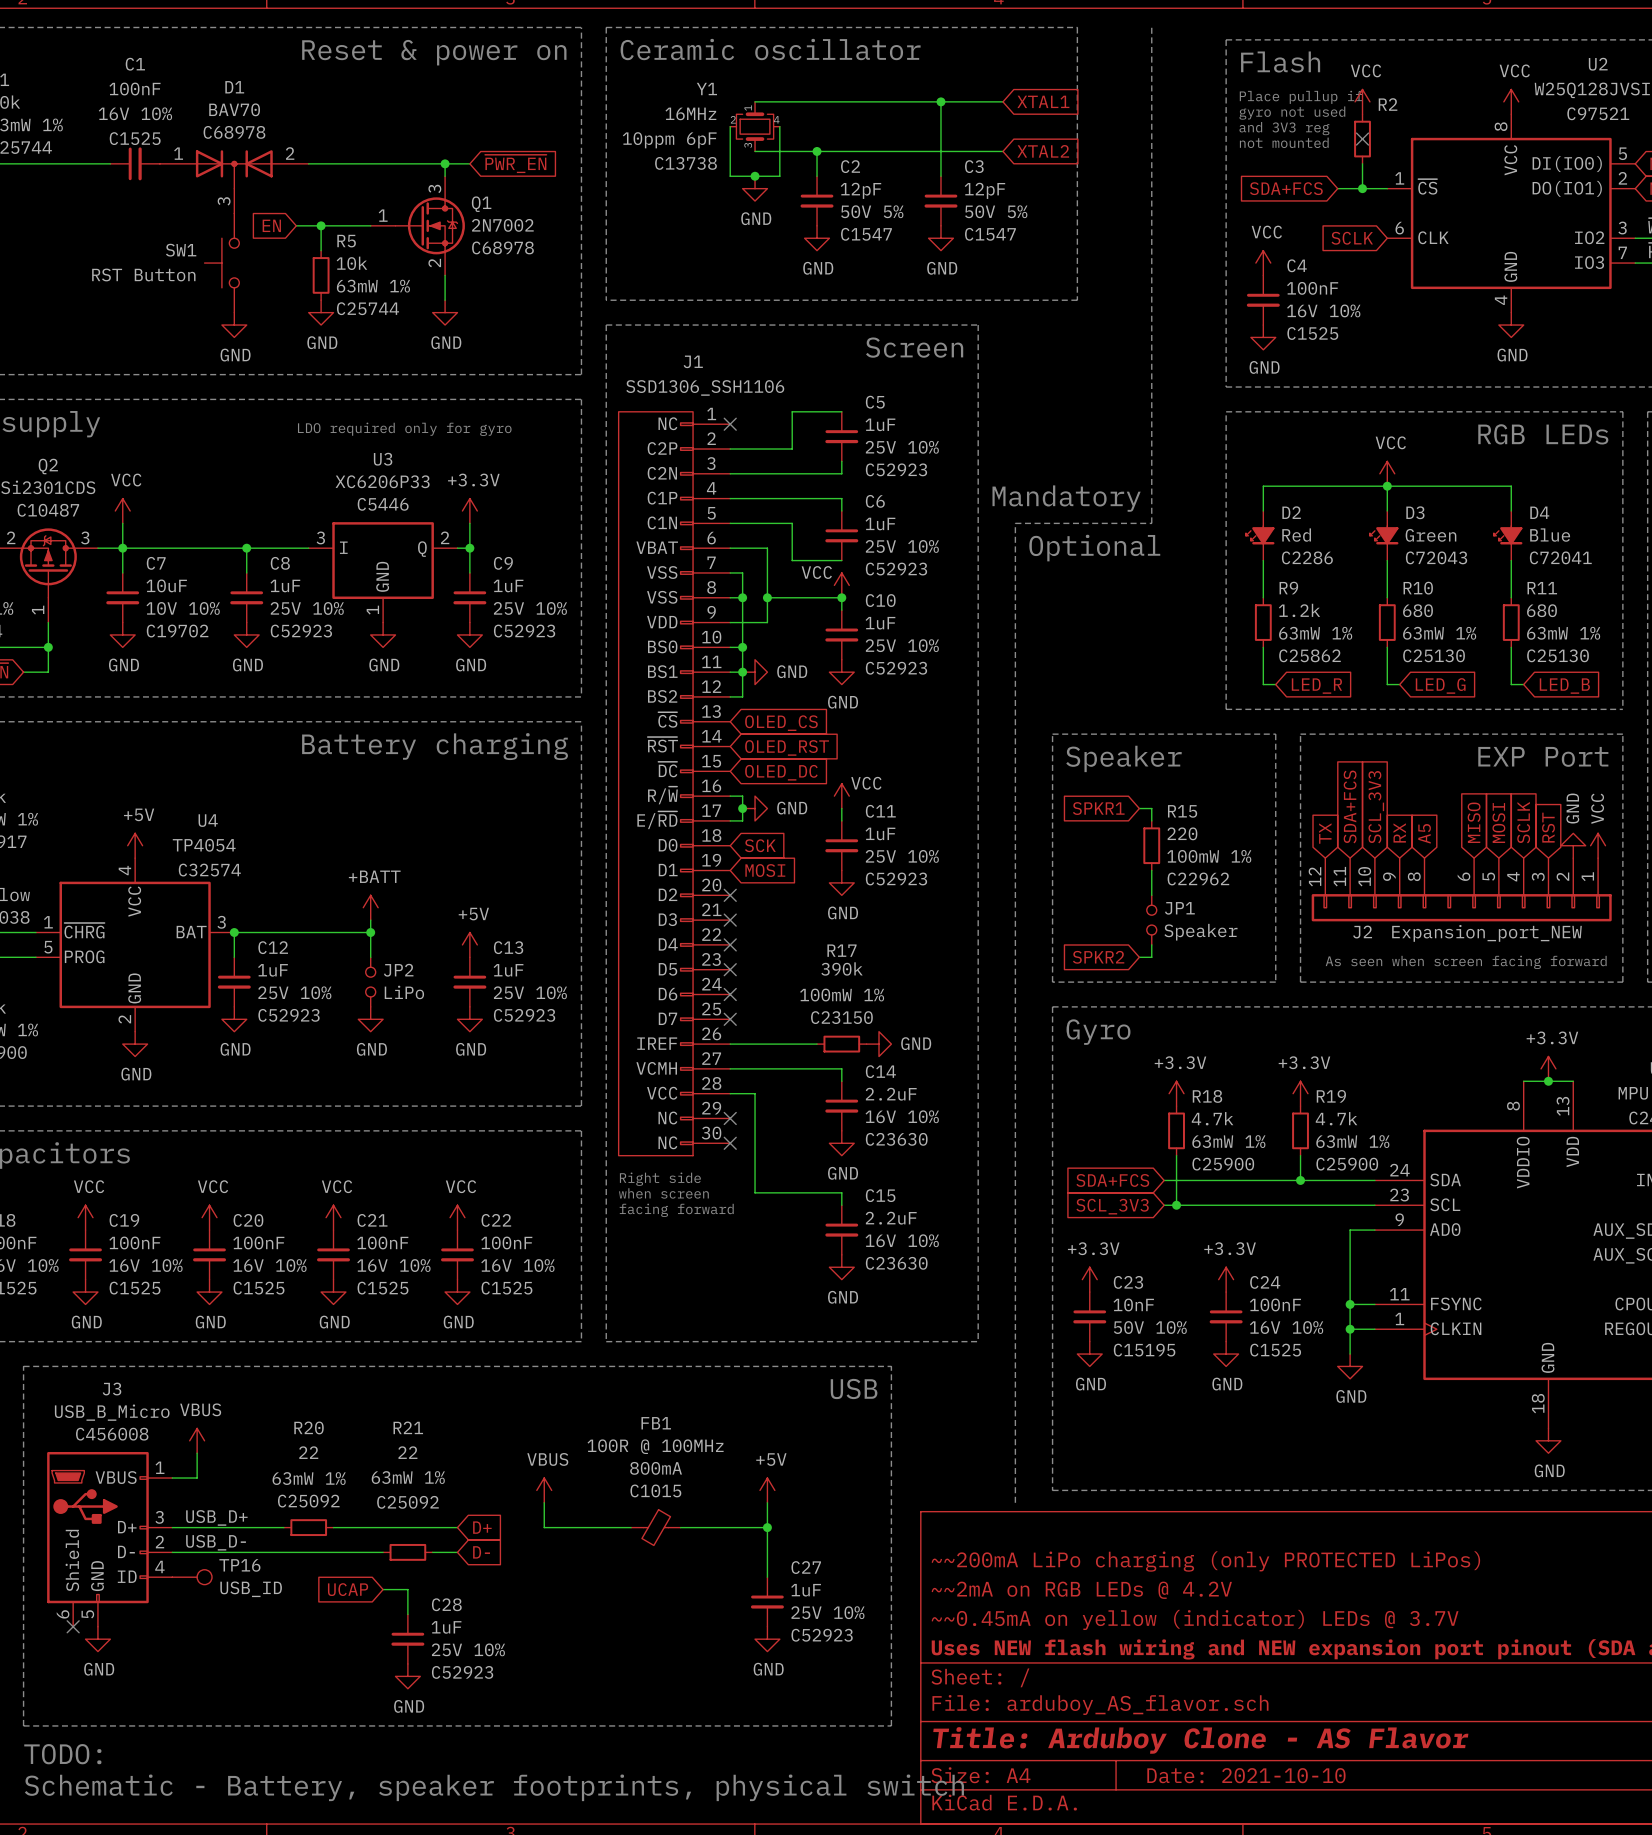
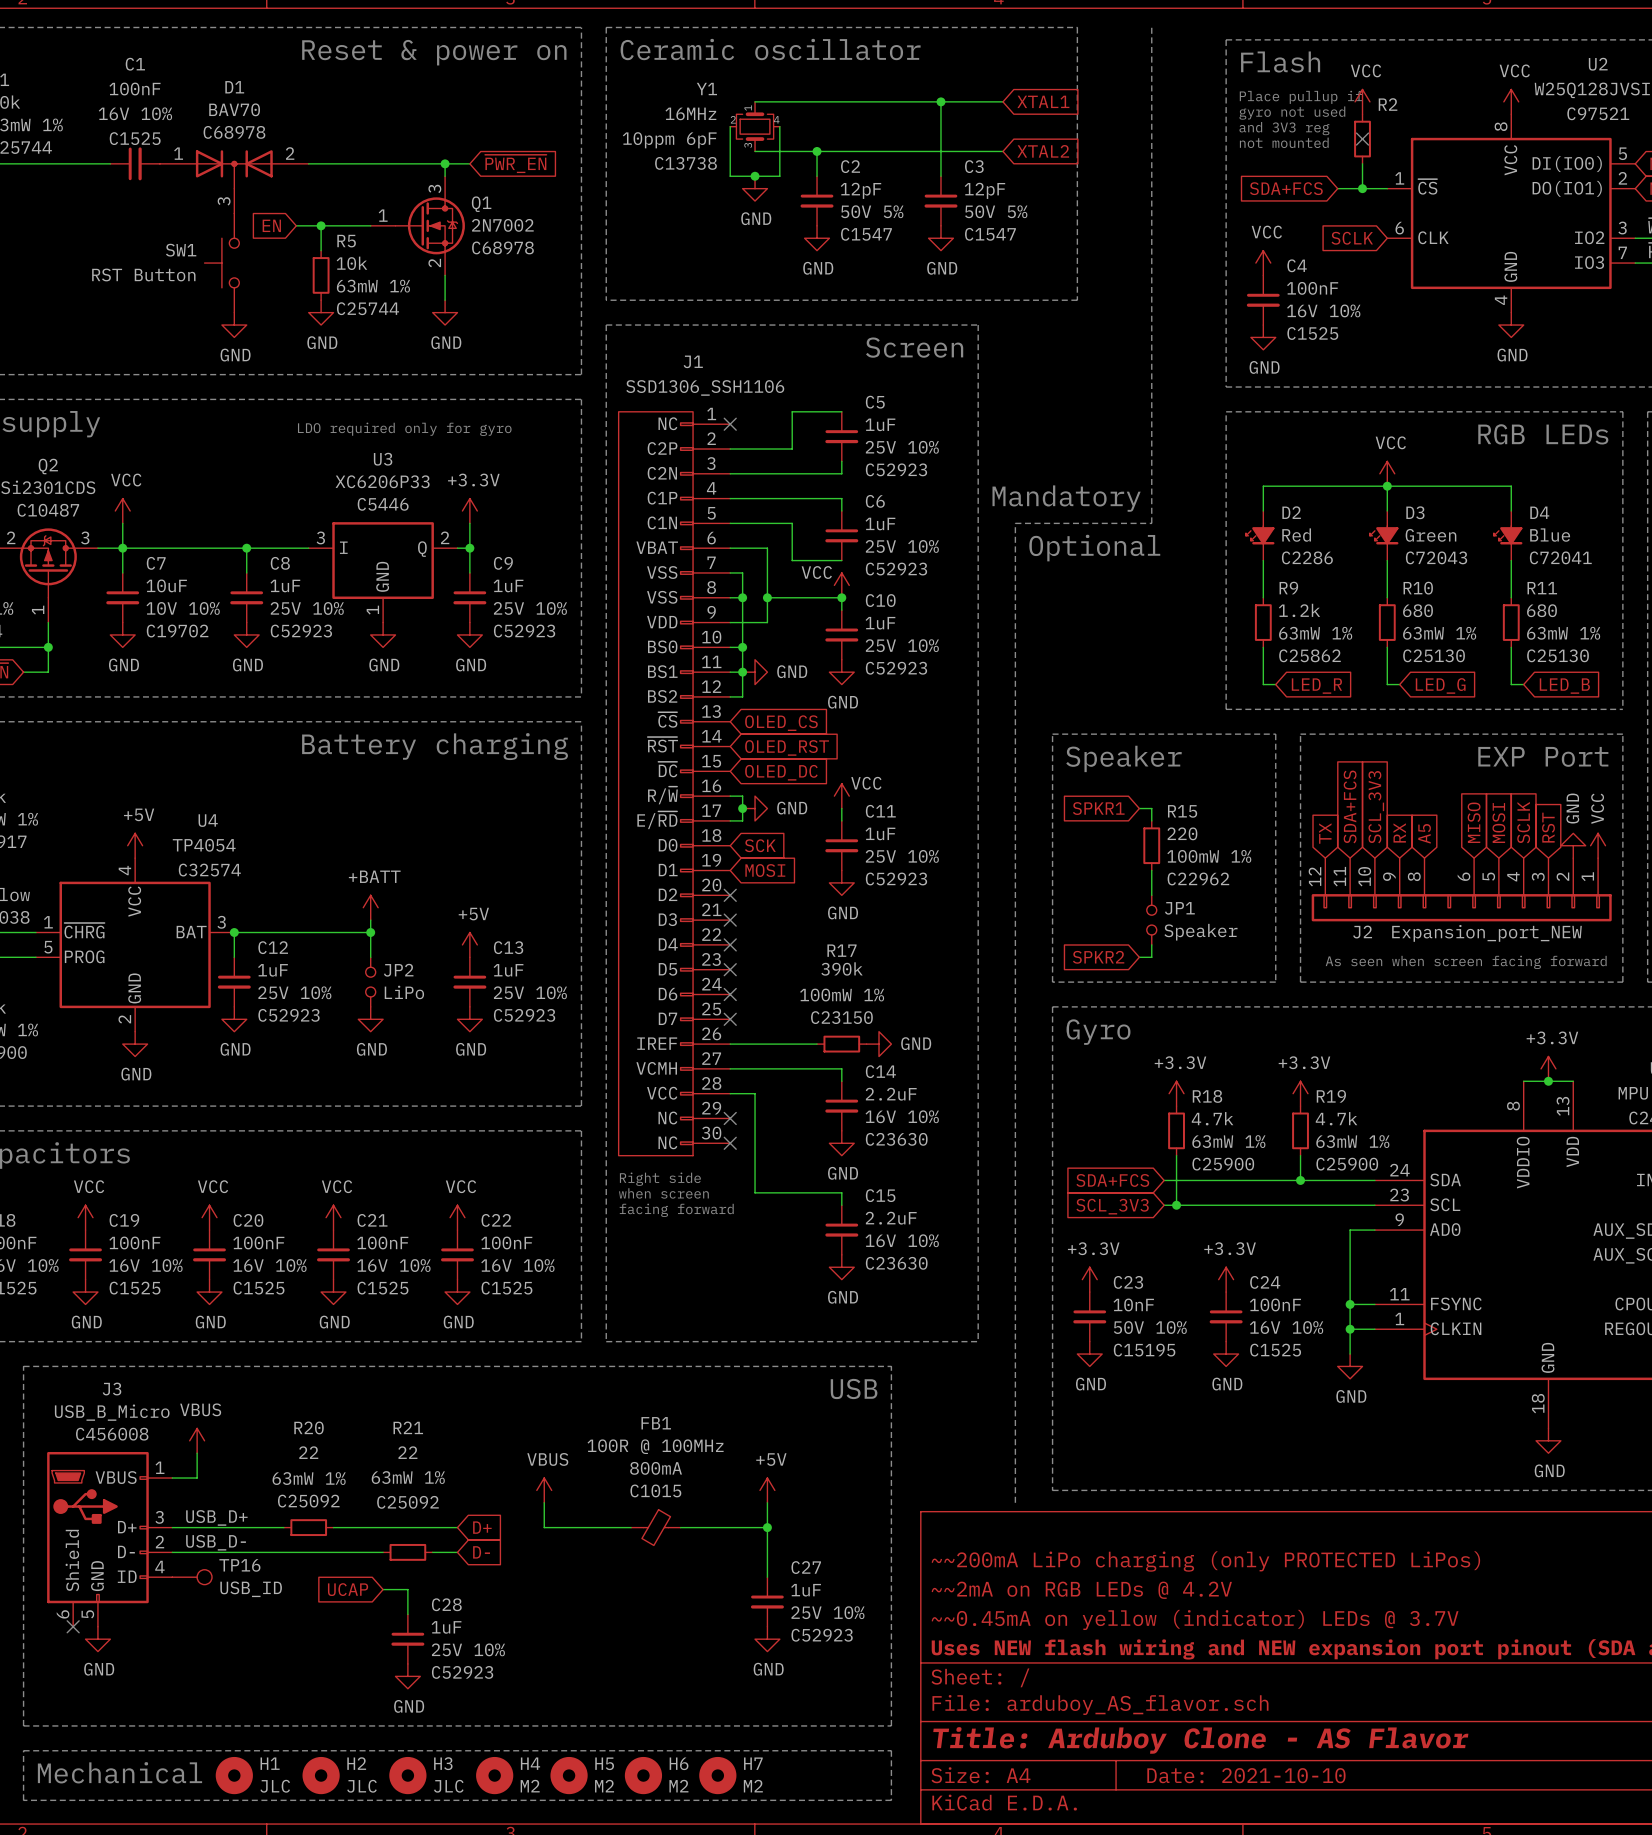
line: none -> (23, 1750) (891, 1750) (891, 1800) (23, 1800) (23, 1750)
text: TODO: (62, 1754) -> none
text: none -> Mechanical (119, 1772)
H1: none -> JLC (234, 1775)
H2: none -> JLC (321, 1775)
H3: none -> JLC (407, 1775)
H4: none -> M2 (494, 1775)
H5: none -> M2 (569, 1775)
H6: none -> M2 (643, 1775)
H7: none -> M2 (717, 1775)
text: Schematic - Battery, speaker footprints, physical switch (494, 1787) -> none

